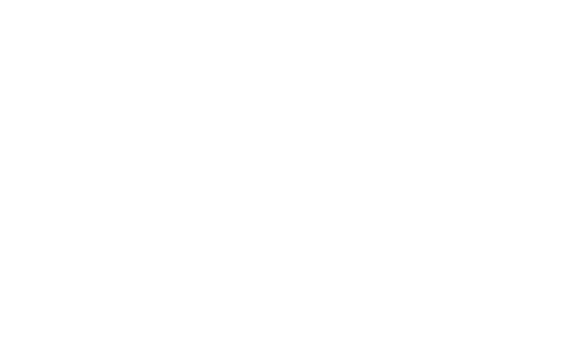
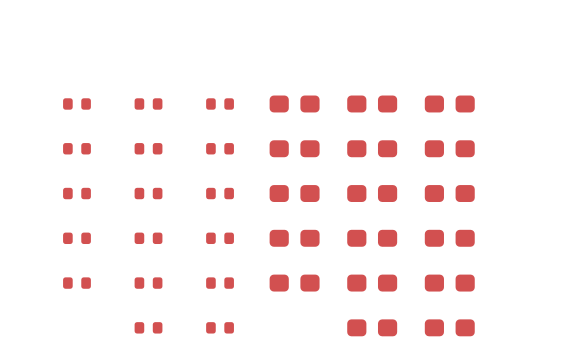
part: none -> (76, 103)
part: none -> (148, 103)
part: none -> (220, 103)
part: none -> (294, 103)
part: none -> (372, 103)
part: none -> (449, 103)
part: none -> (76, 148)
part: none -> (148, 148)
part: none -> (220, 148)
part: none -> (294, 148)
part: none -> (372, 148)
part: none -> (449, 148)
part: none -> (76, 193)
part: none -> (148, 193)
part: none -> (220, 193)
part: none -> (294, 193)
part: none -> (372, 193)
part: none -> (449, 193)
part: none -> (76, 238)
part: none -> (148, 238)
part: none -> (220, 238)
part: none -> (294, 238)
part: none -> (372, 238)
part: none -> (449, 238)
part: none -> (76, 283)
part: none -> (148, 283)
part: none -> (220, 283)
part: none -> (294, 283)
part: none -> (372, 283)
part: none -> (449, 283)
part: none -> (148, 327)
part: none -> (220, 327)
part: none -> (372, 327)
part: none -> (449, 327)

